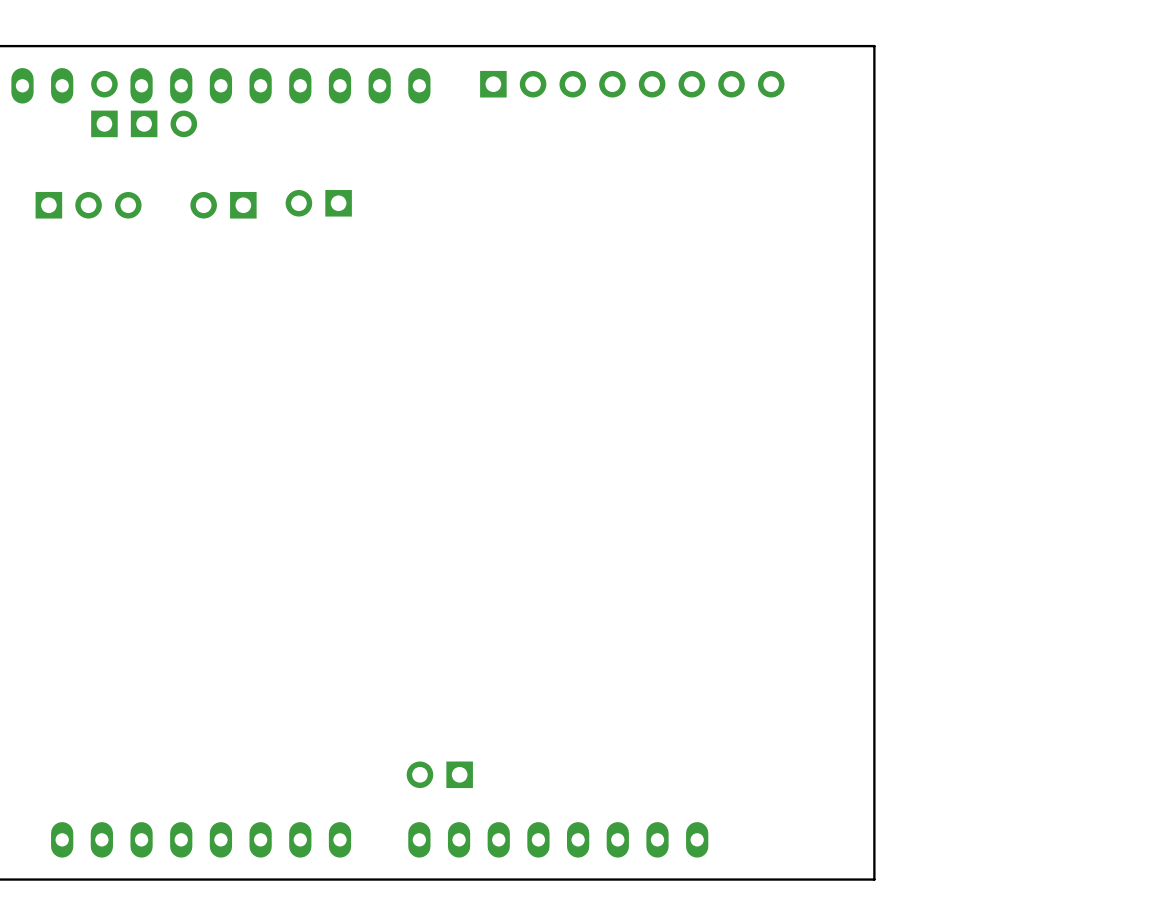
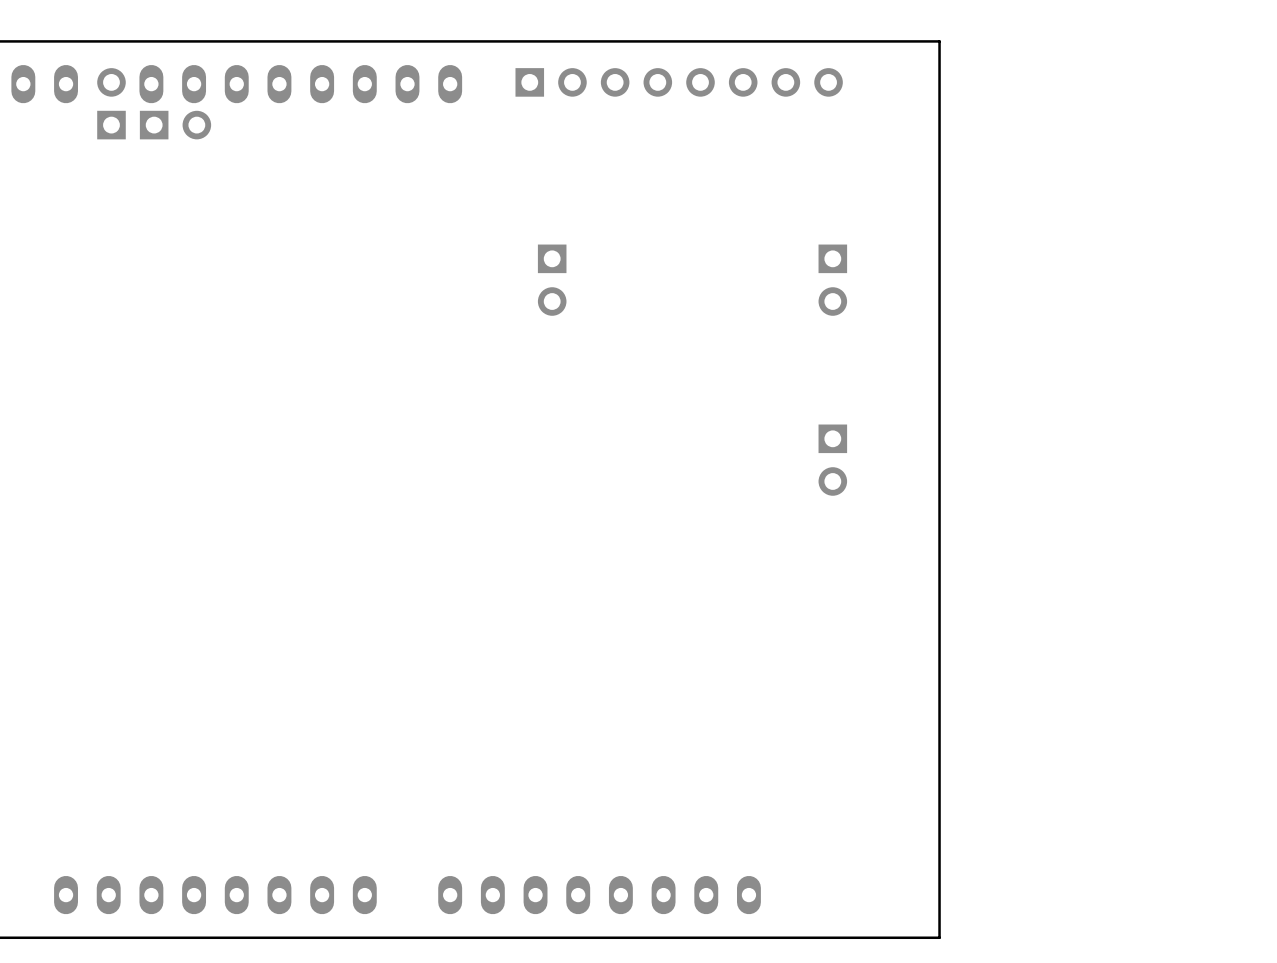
part: (318, 203) -> none
part: (88, 205) -> none
part: (223, 205) -> none
part: none -> (552, 280)
part: none -> (832, 280)
part: none -> (832, 460)
part: (439, 774) -> none

